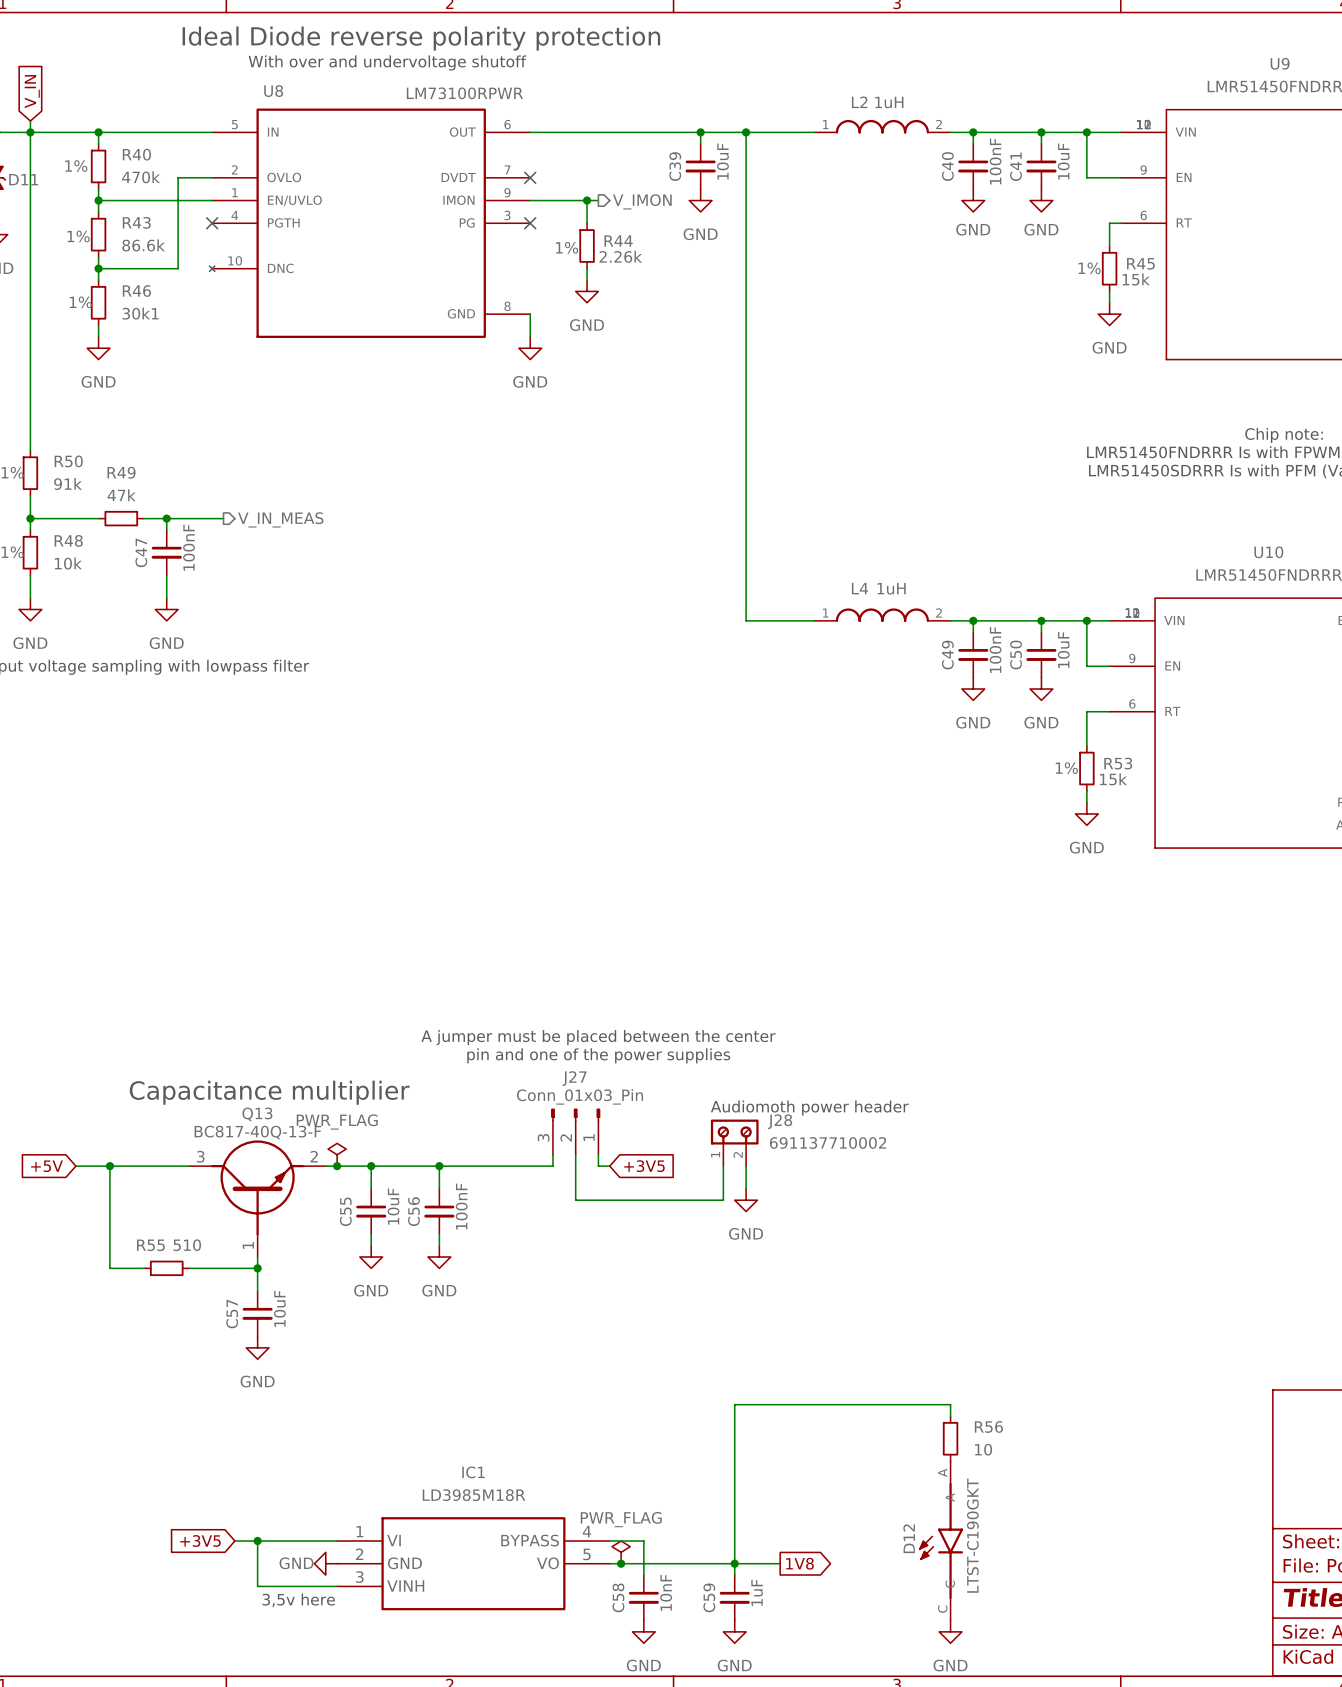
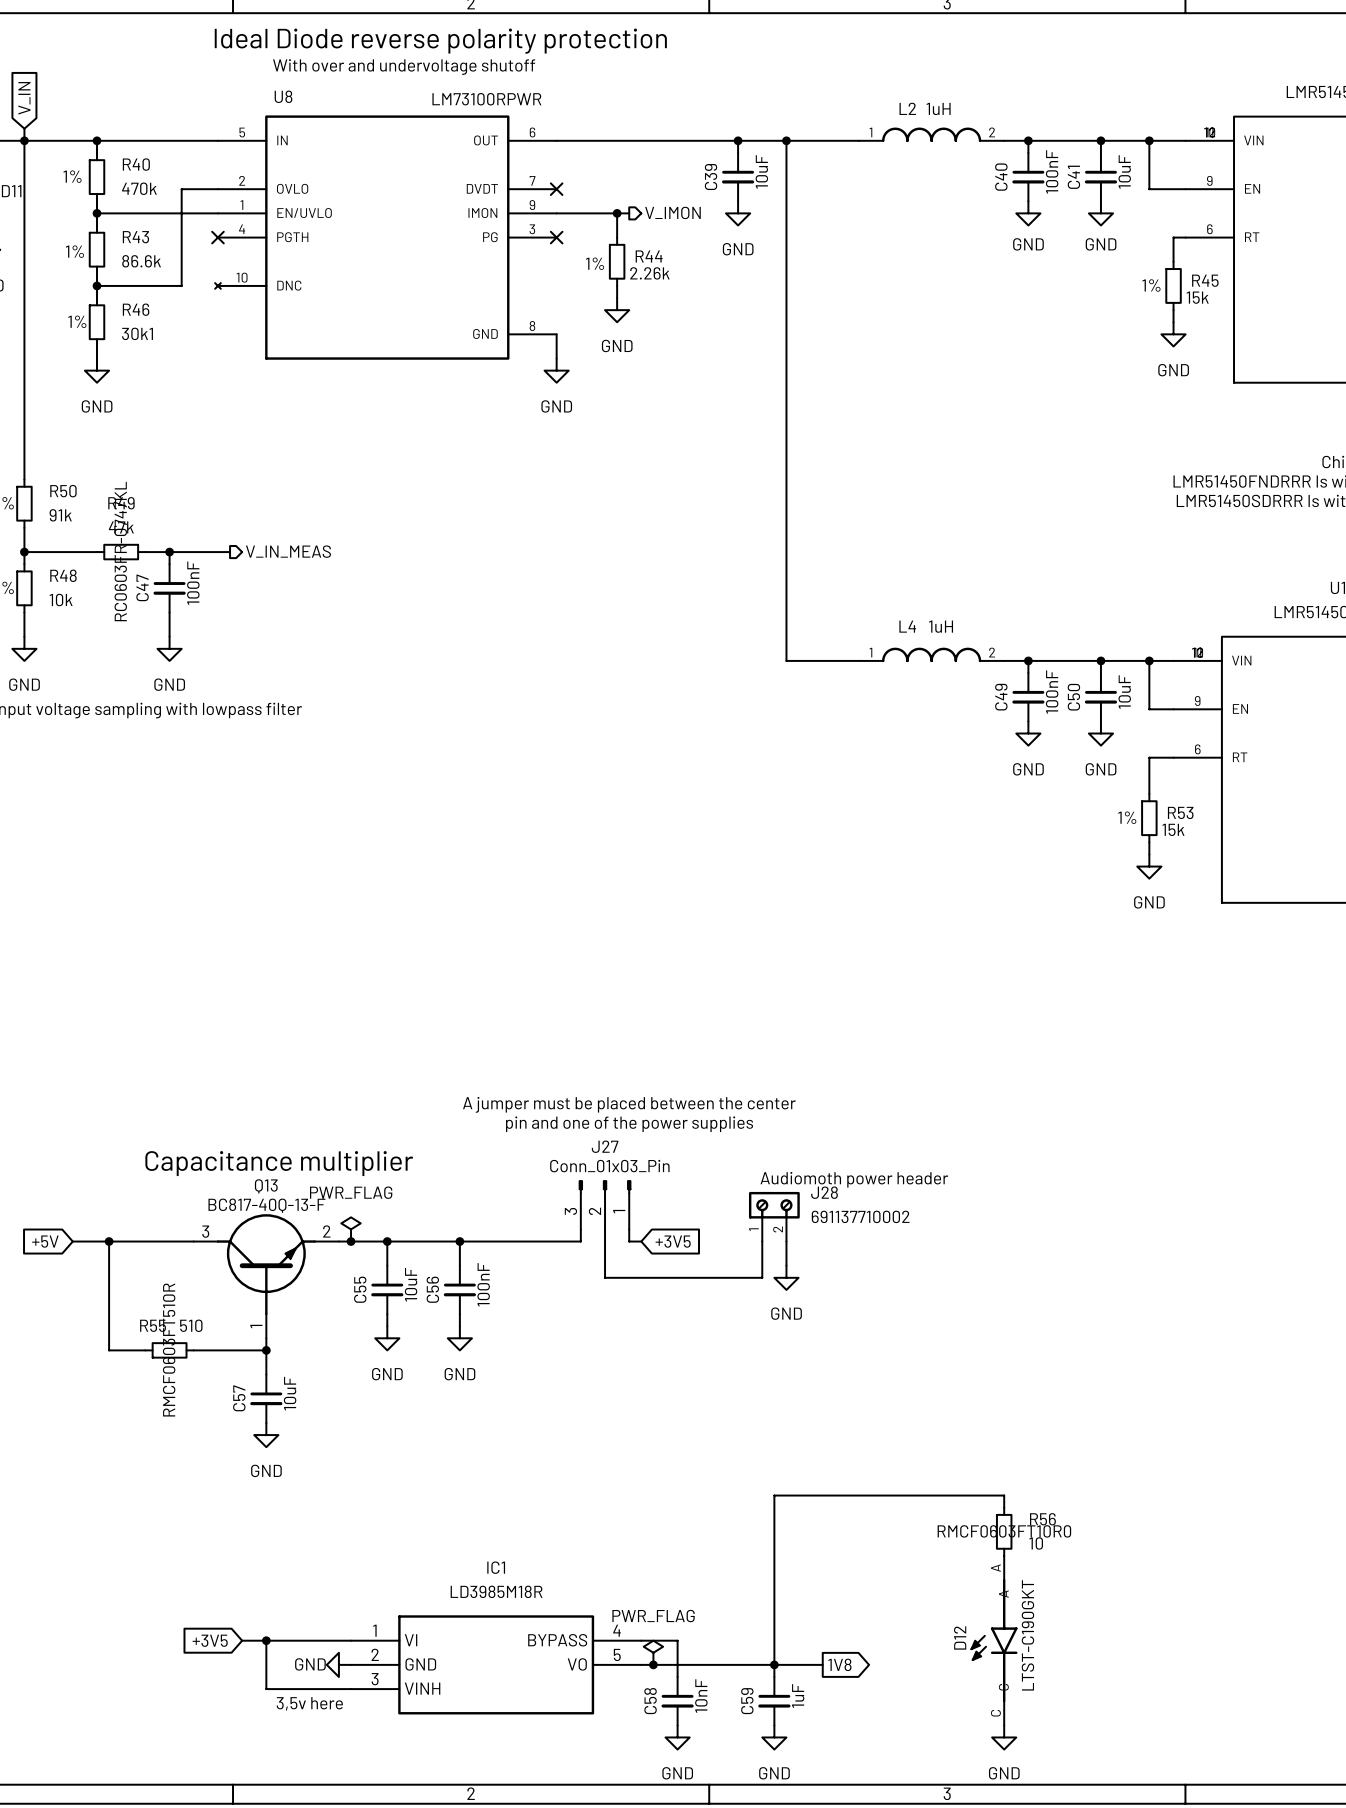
R49 text: none -> RC0603FR-0747KL (120, 551)
R55 text: none -> RMCF0603FT510R (169, 1350)
R56 text: none -> RMCF0603FT10R0 (1004, 1531)

